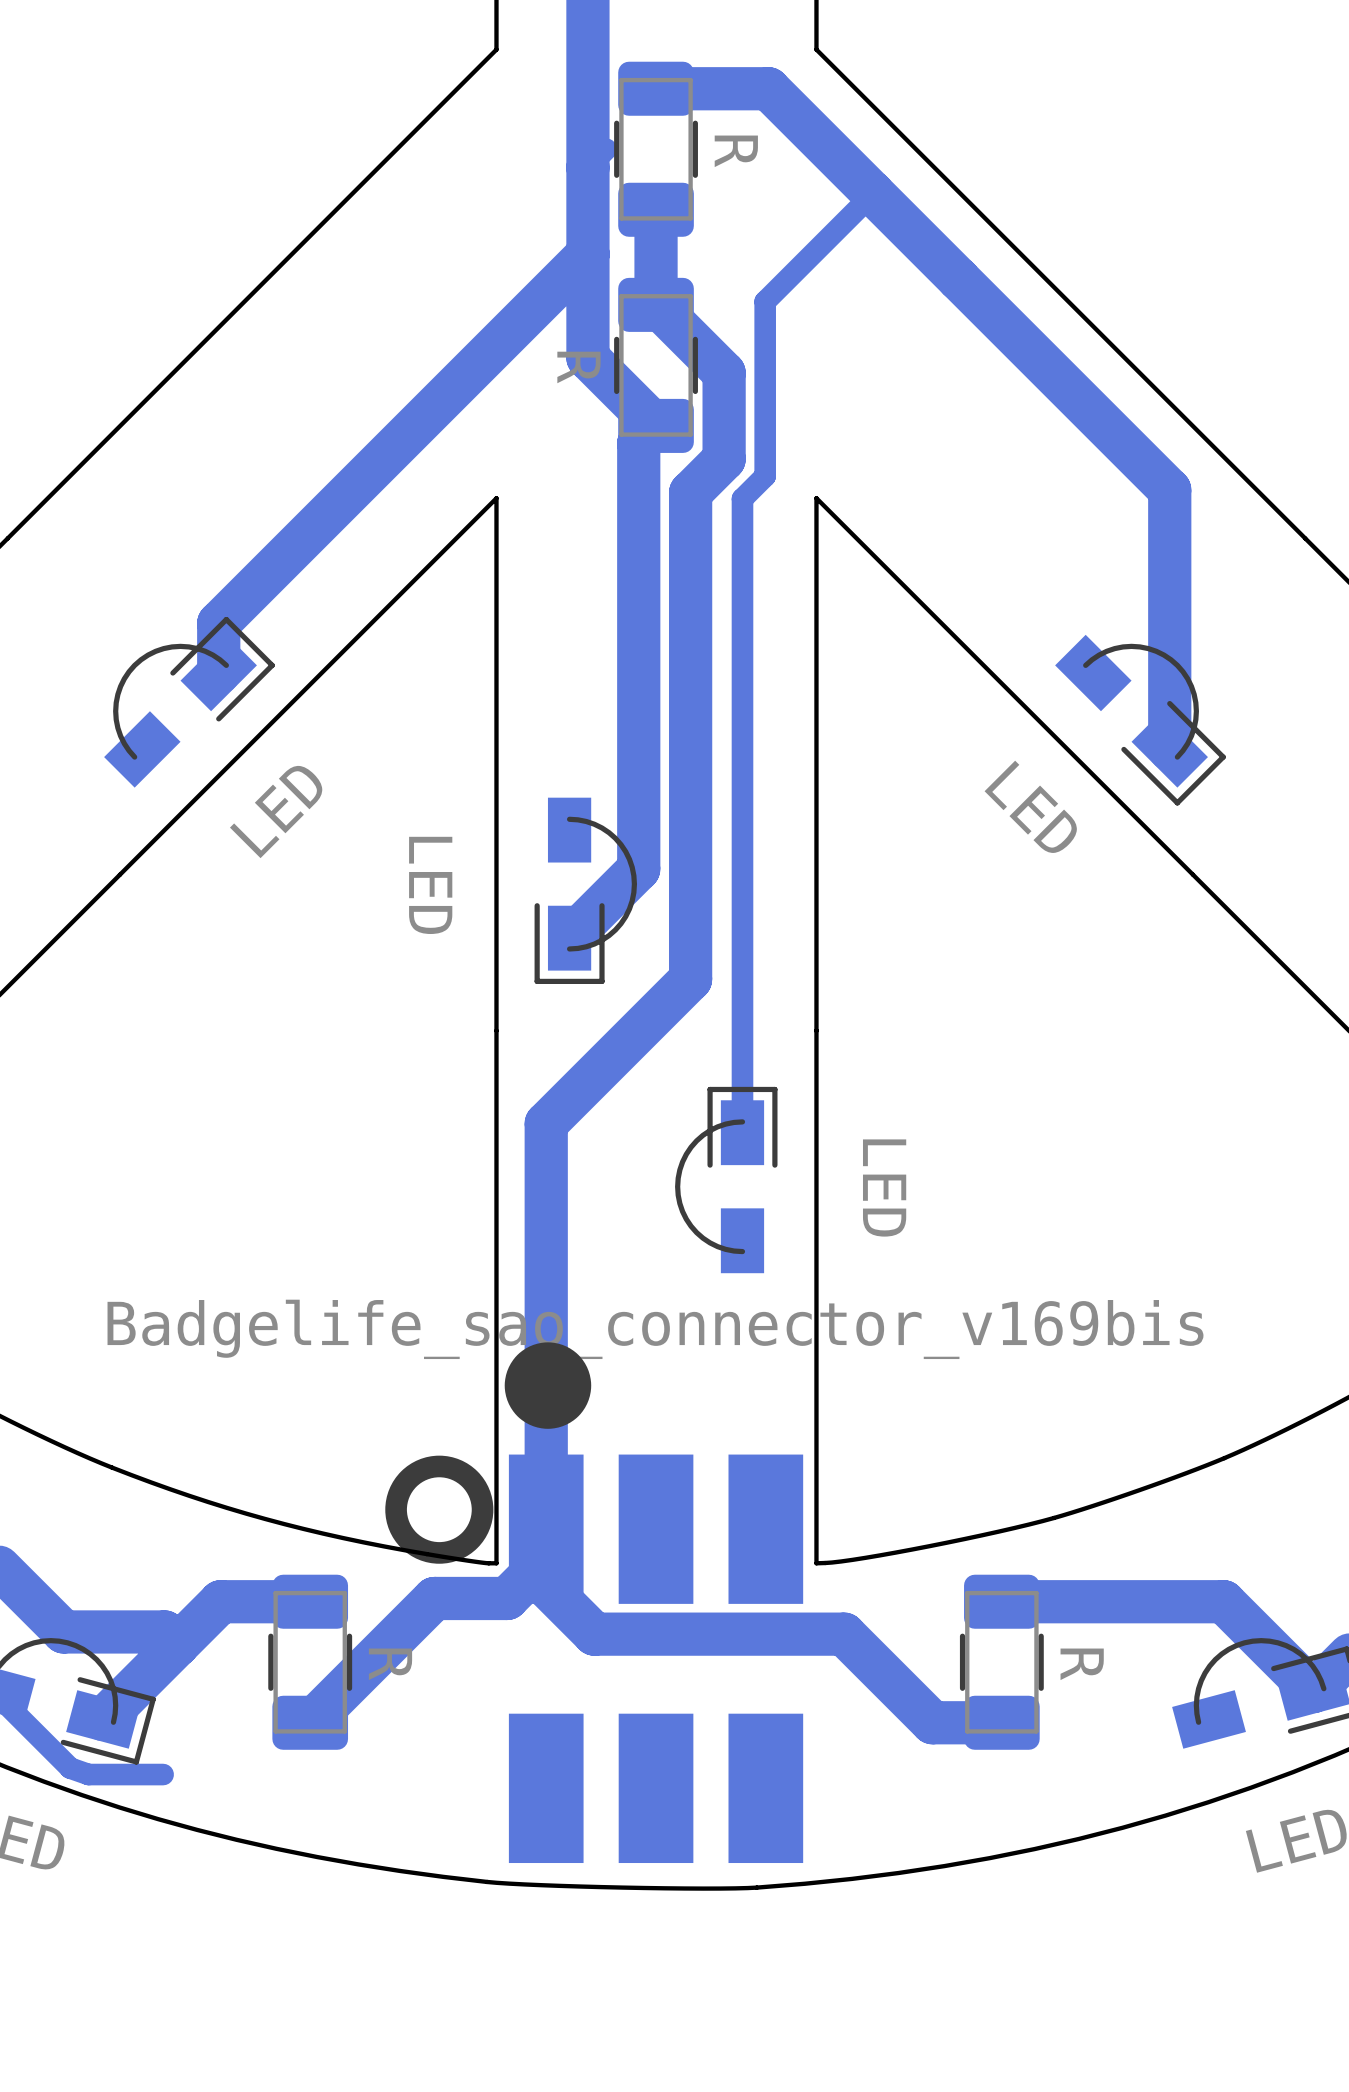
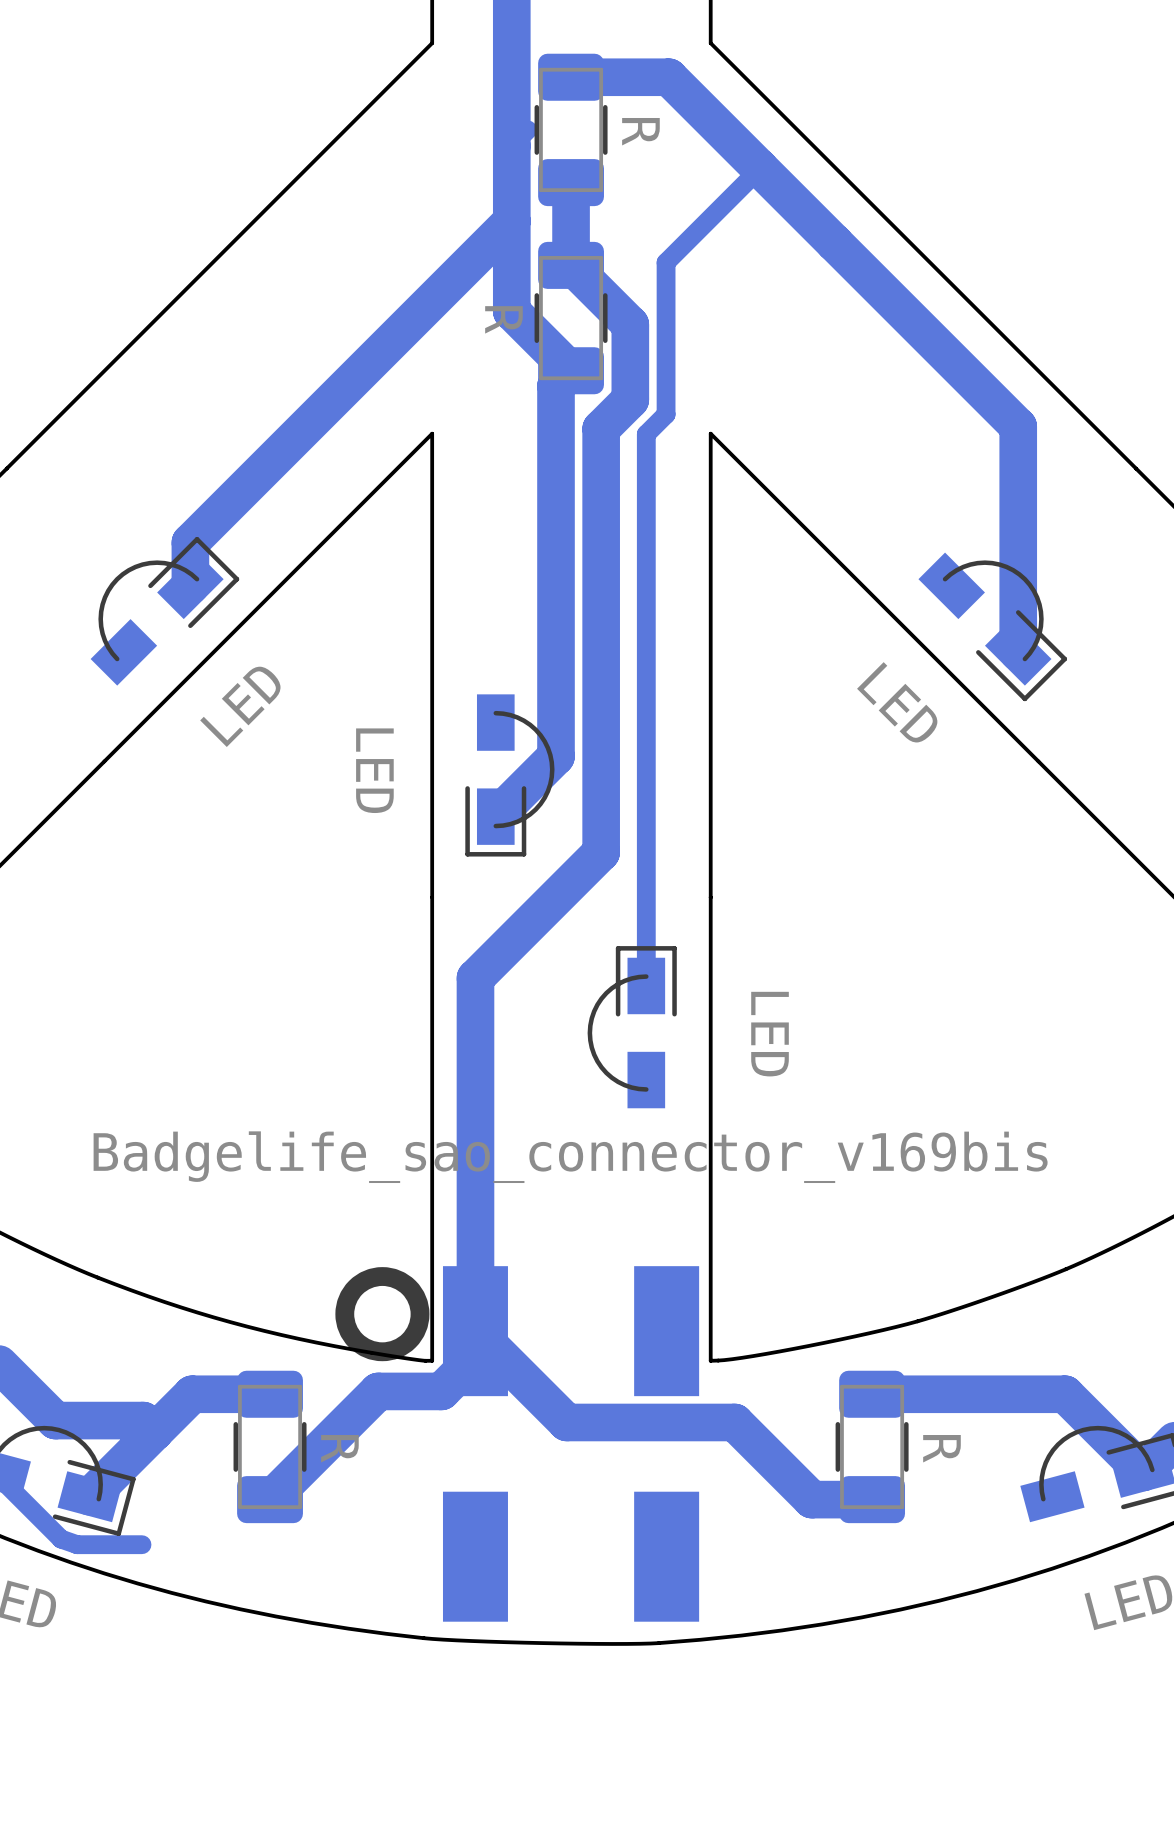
drawing: [504, 1342, 592, 1429] -> none
part footprint: [385, 1454, 804, 1864] -> [335, 1266, 700, 1622]
bottom track: (546, 1559) (546, 1585) (594, 1634) (651, 1634) -> (475, 1331) (566, 1422)

